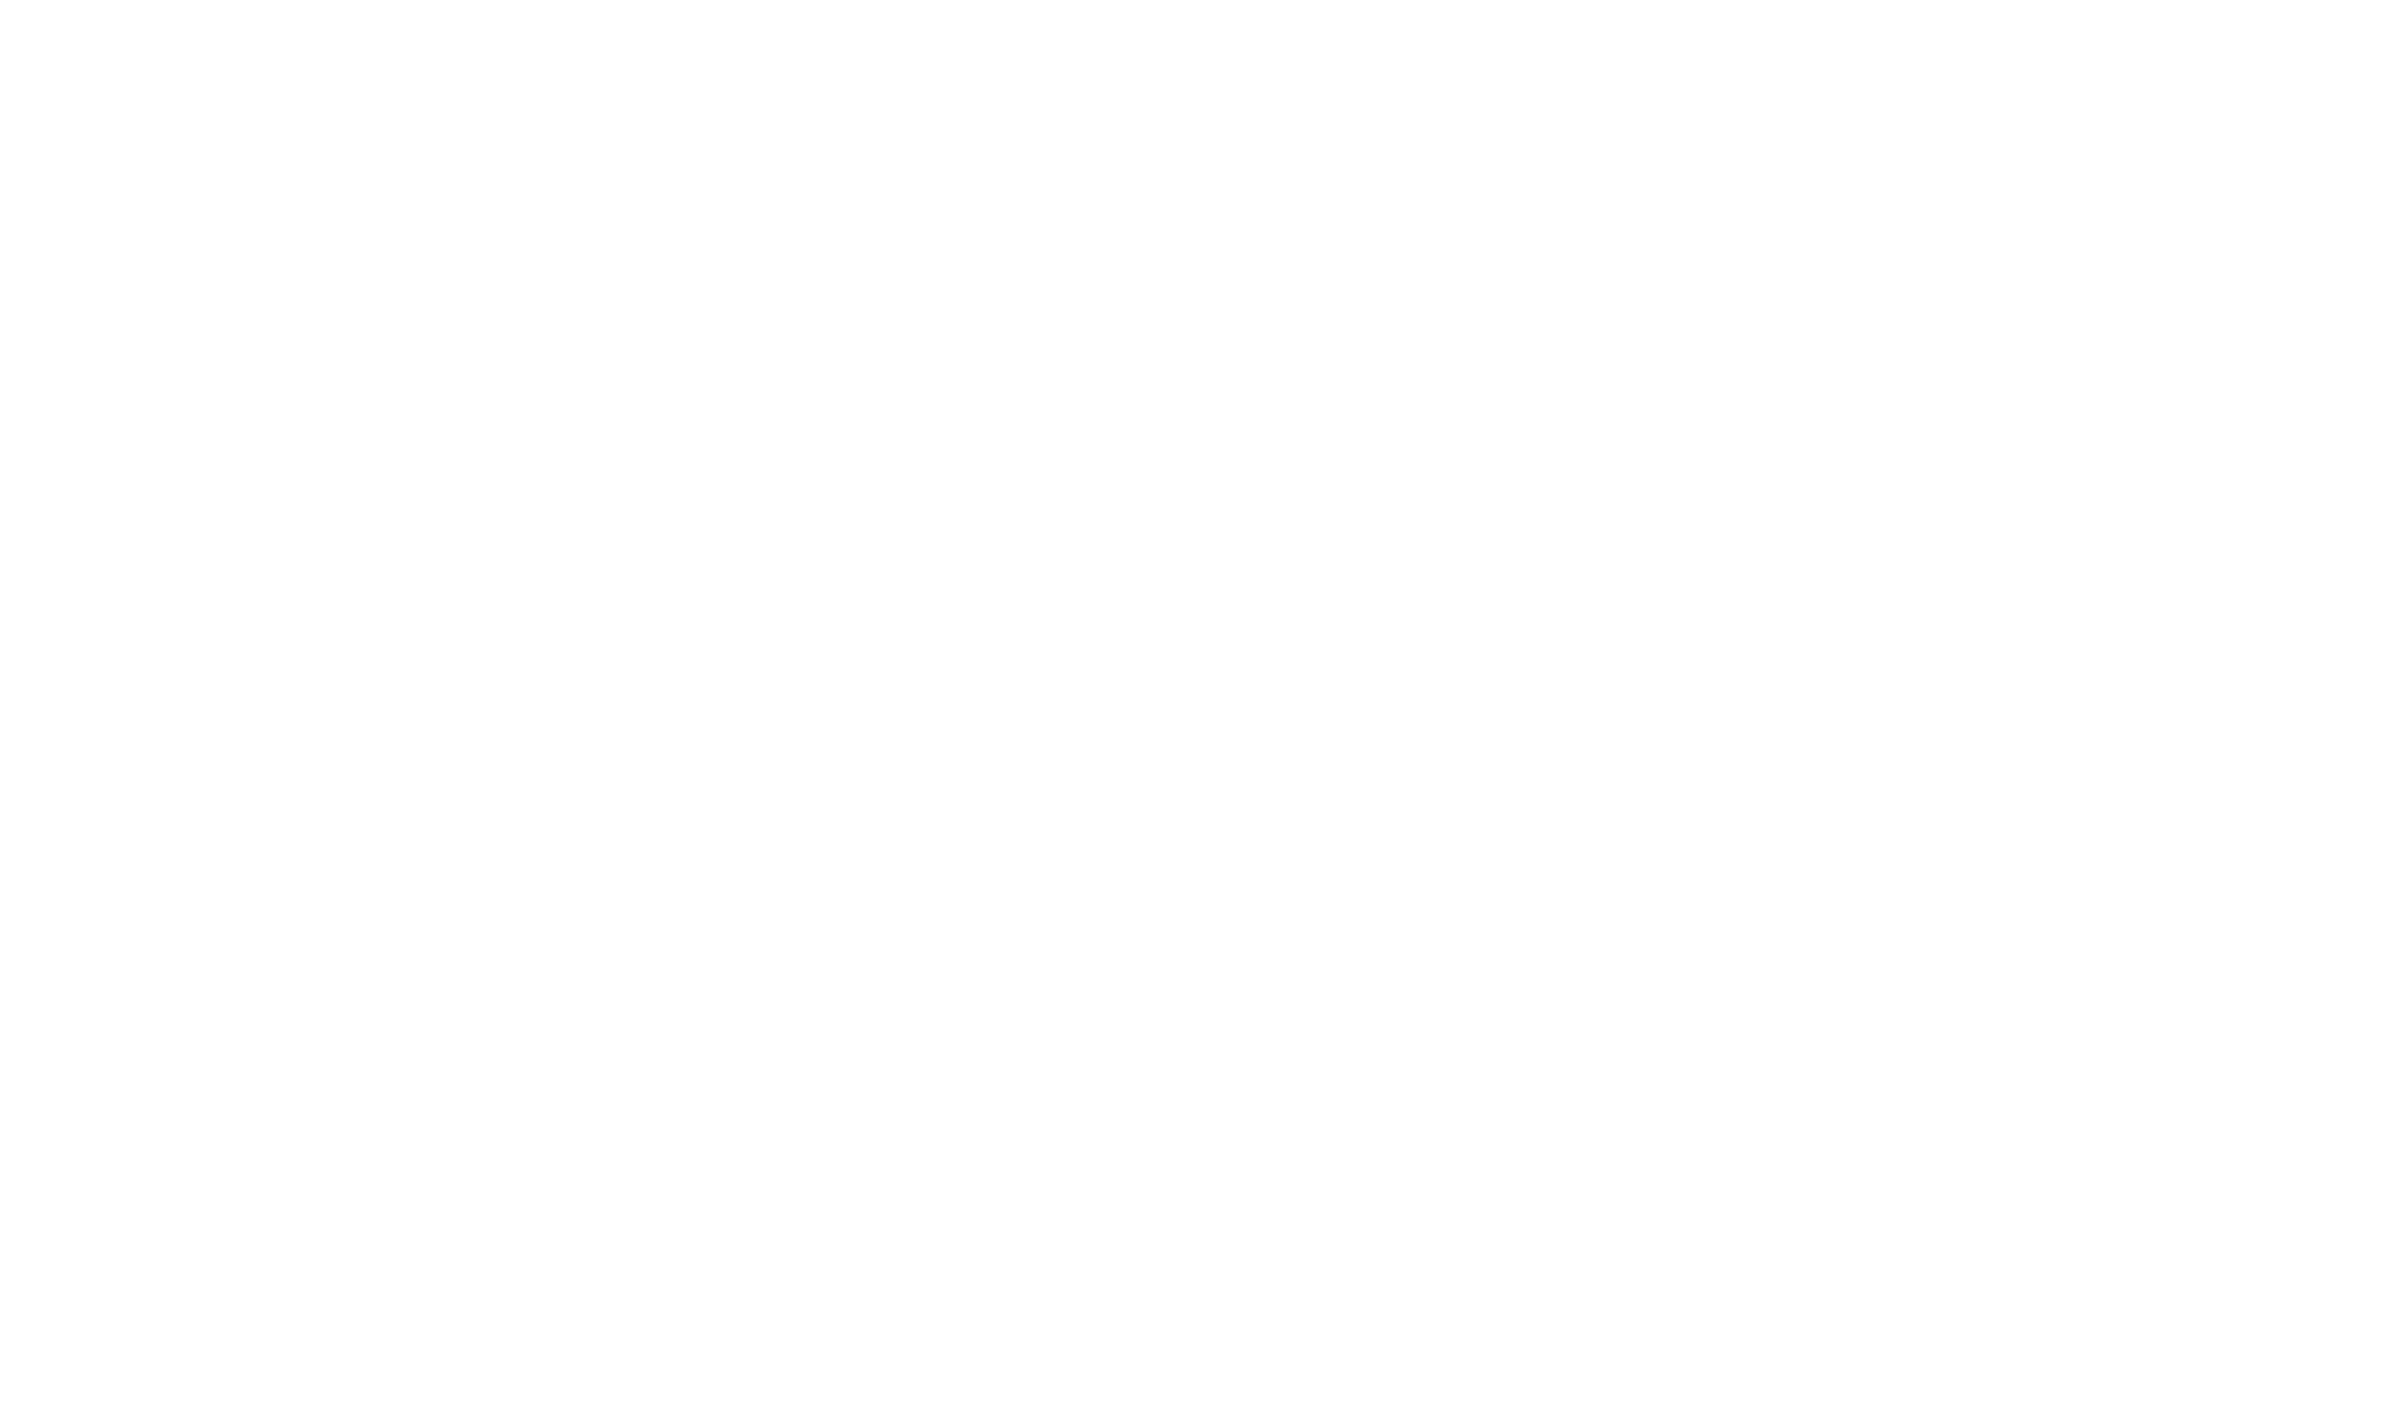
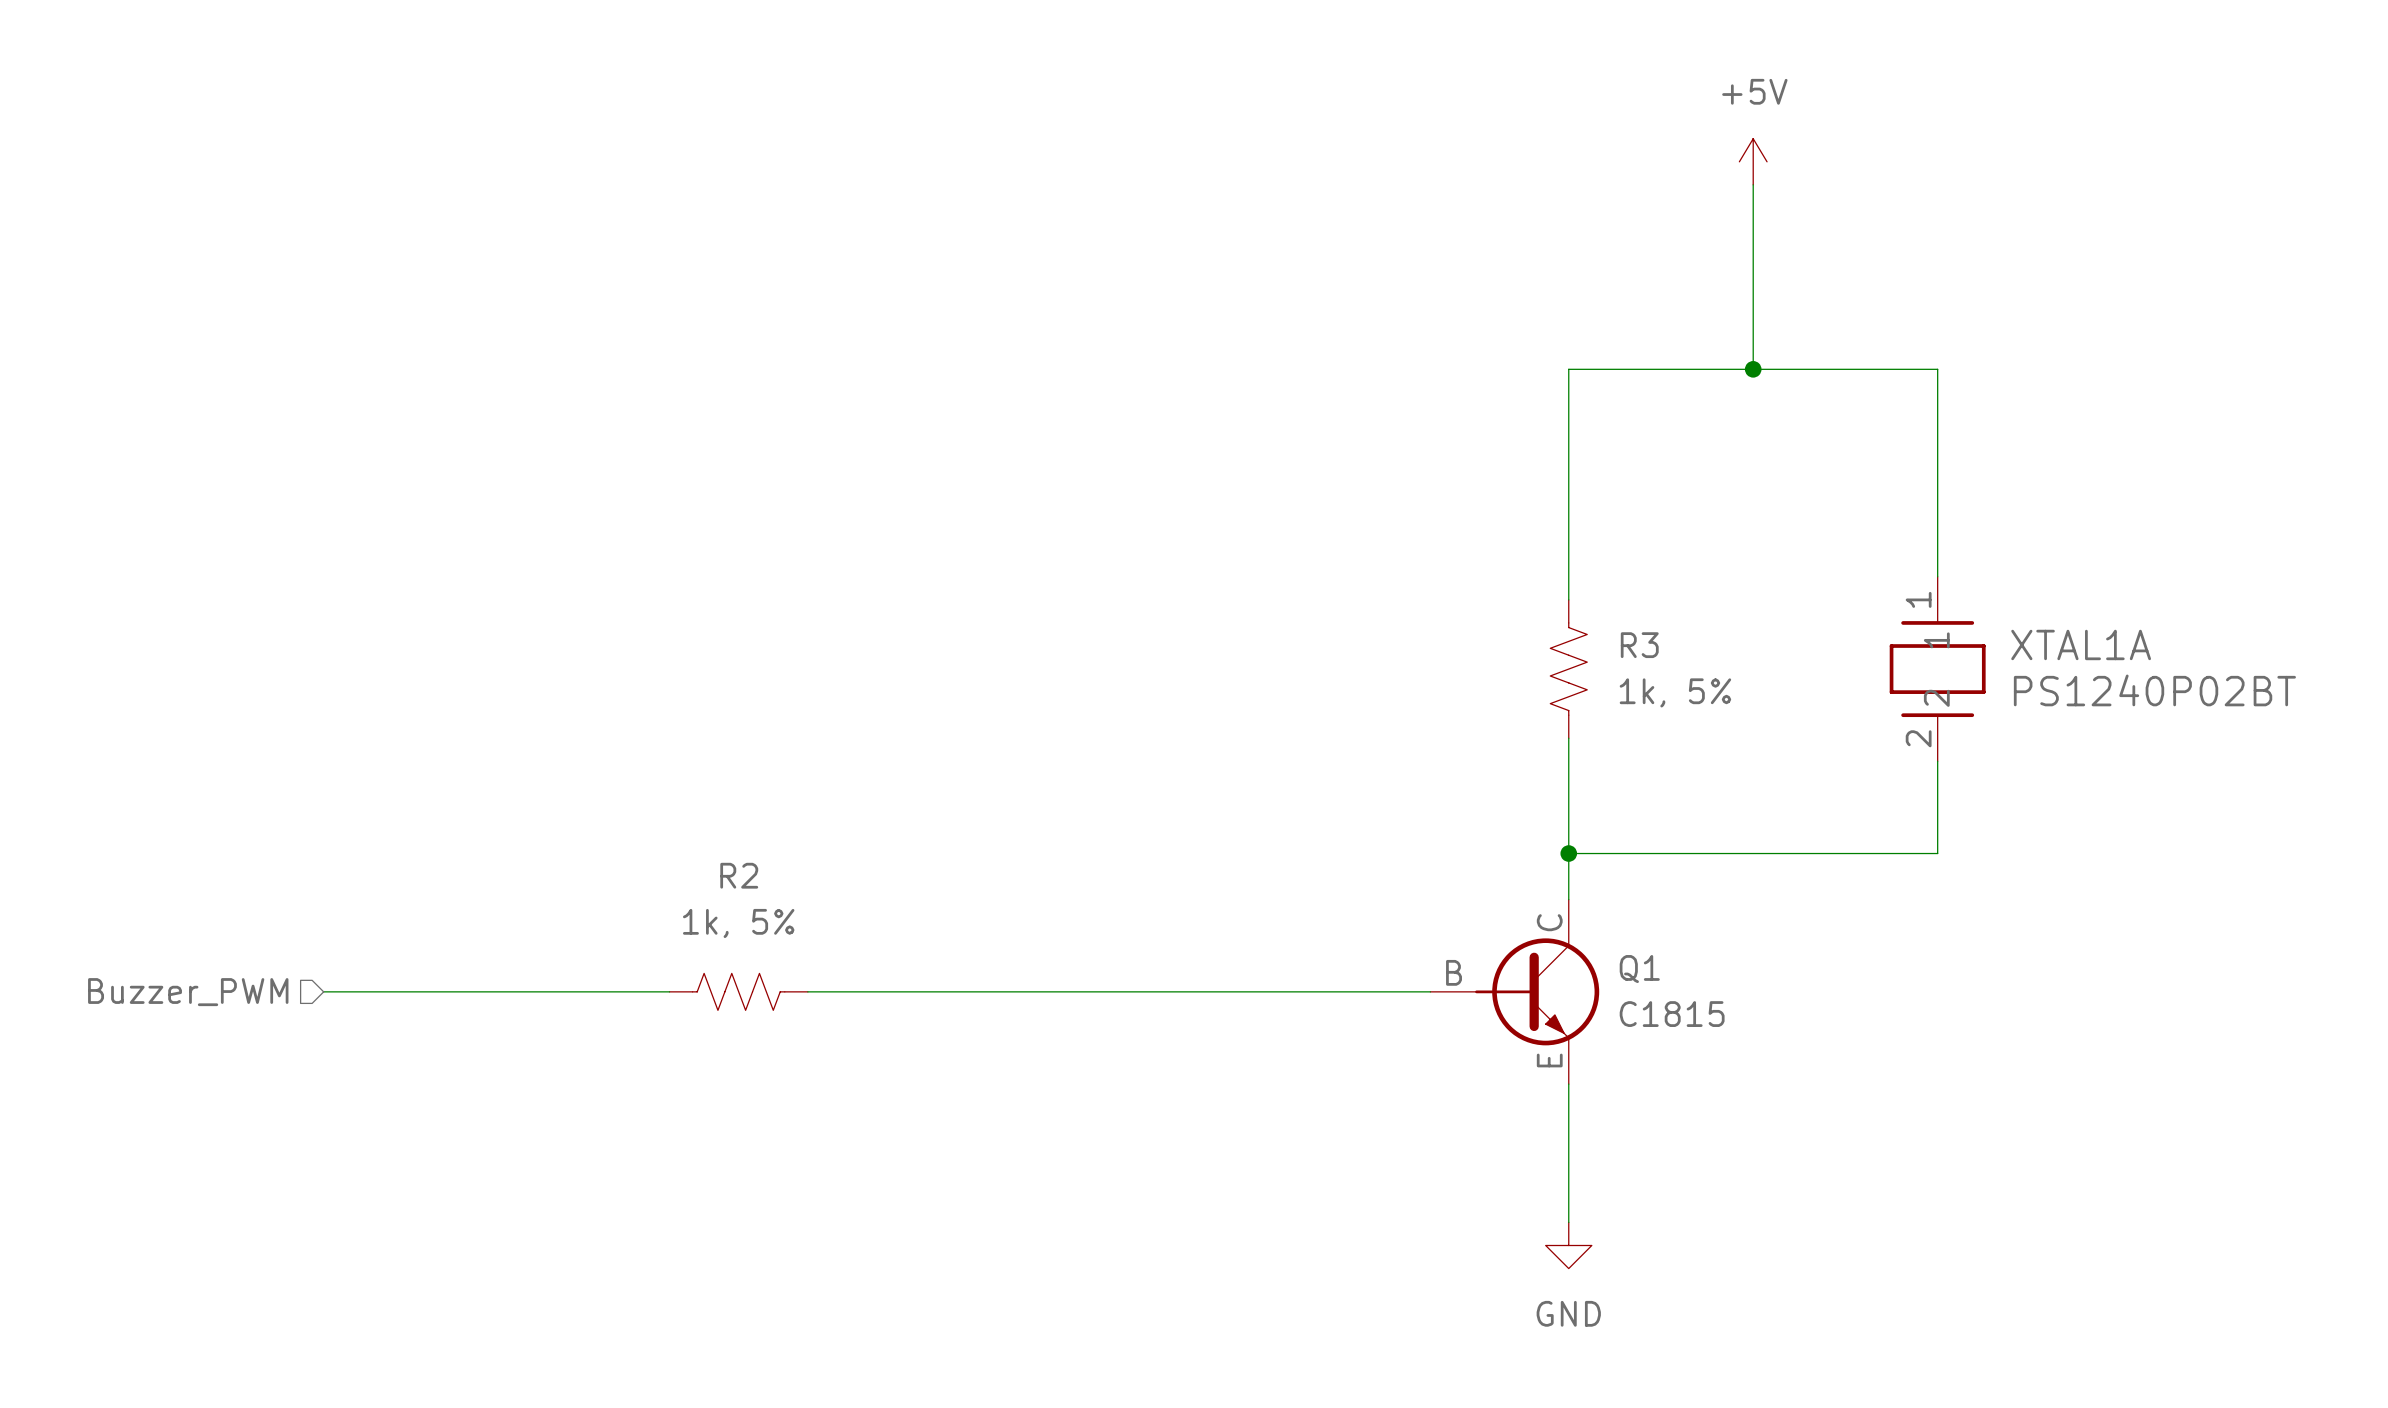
power symbol: none -> +5V (1753, 161)
wire: none -> (1753, 184) (1753, 369)
junction: none -> (1753, 369)
wire: none -> (1937, 576) (1937, 369) (1568, 369) (1568, 599)
R3: none -> 1k, 5% (1568, 669)
XTAL1A: none -> PS1240P02BT (1937, 669)
wire: none -> (1568, 738) (1568, 899)
wire: none -> (1937, 761) (1937, 853) (1568, 853)
junction: none -> (1568, 853)
wire: none -> (323, 991) (669, 991)
R2: none -> 1k, 5% (738, 991)
wire: none -> (807, 991) (1430, 991)
Q1: none -> C1815 (1514, 991)
hierarchical label: none -> Buzzer_PWM (188, 992)
wire: none -> (1568, 1084) (1568, 1222)
power symbol: none -> GND (1568, 1245)

